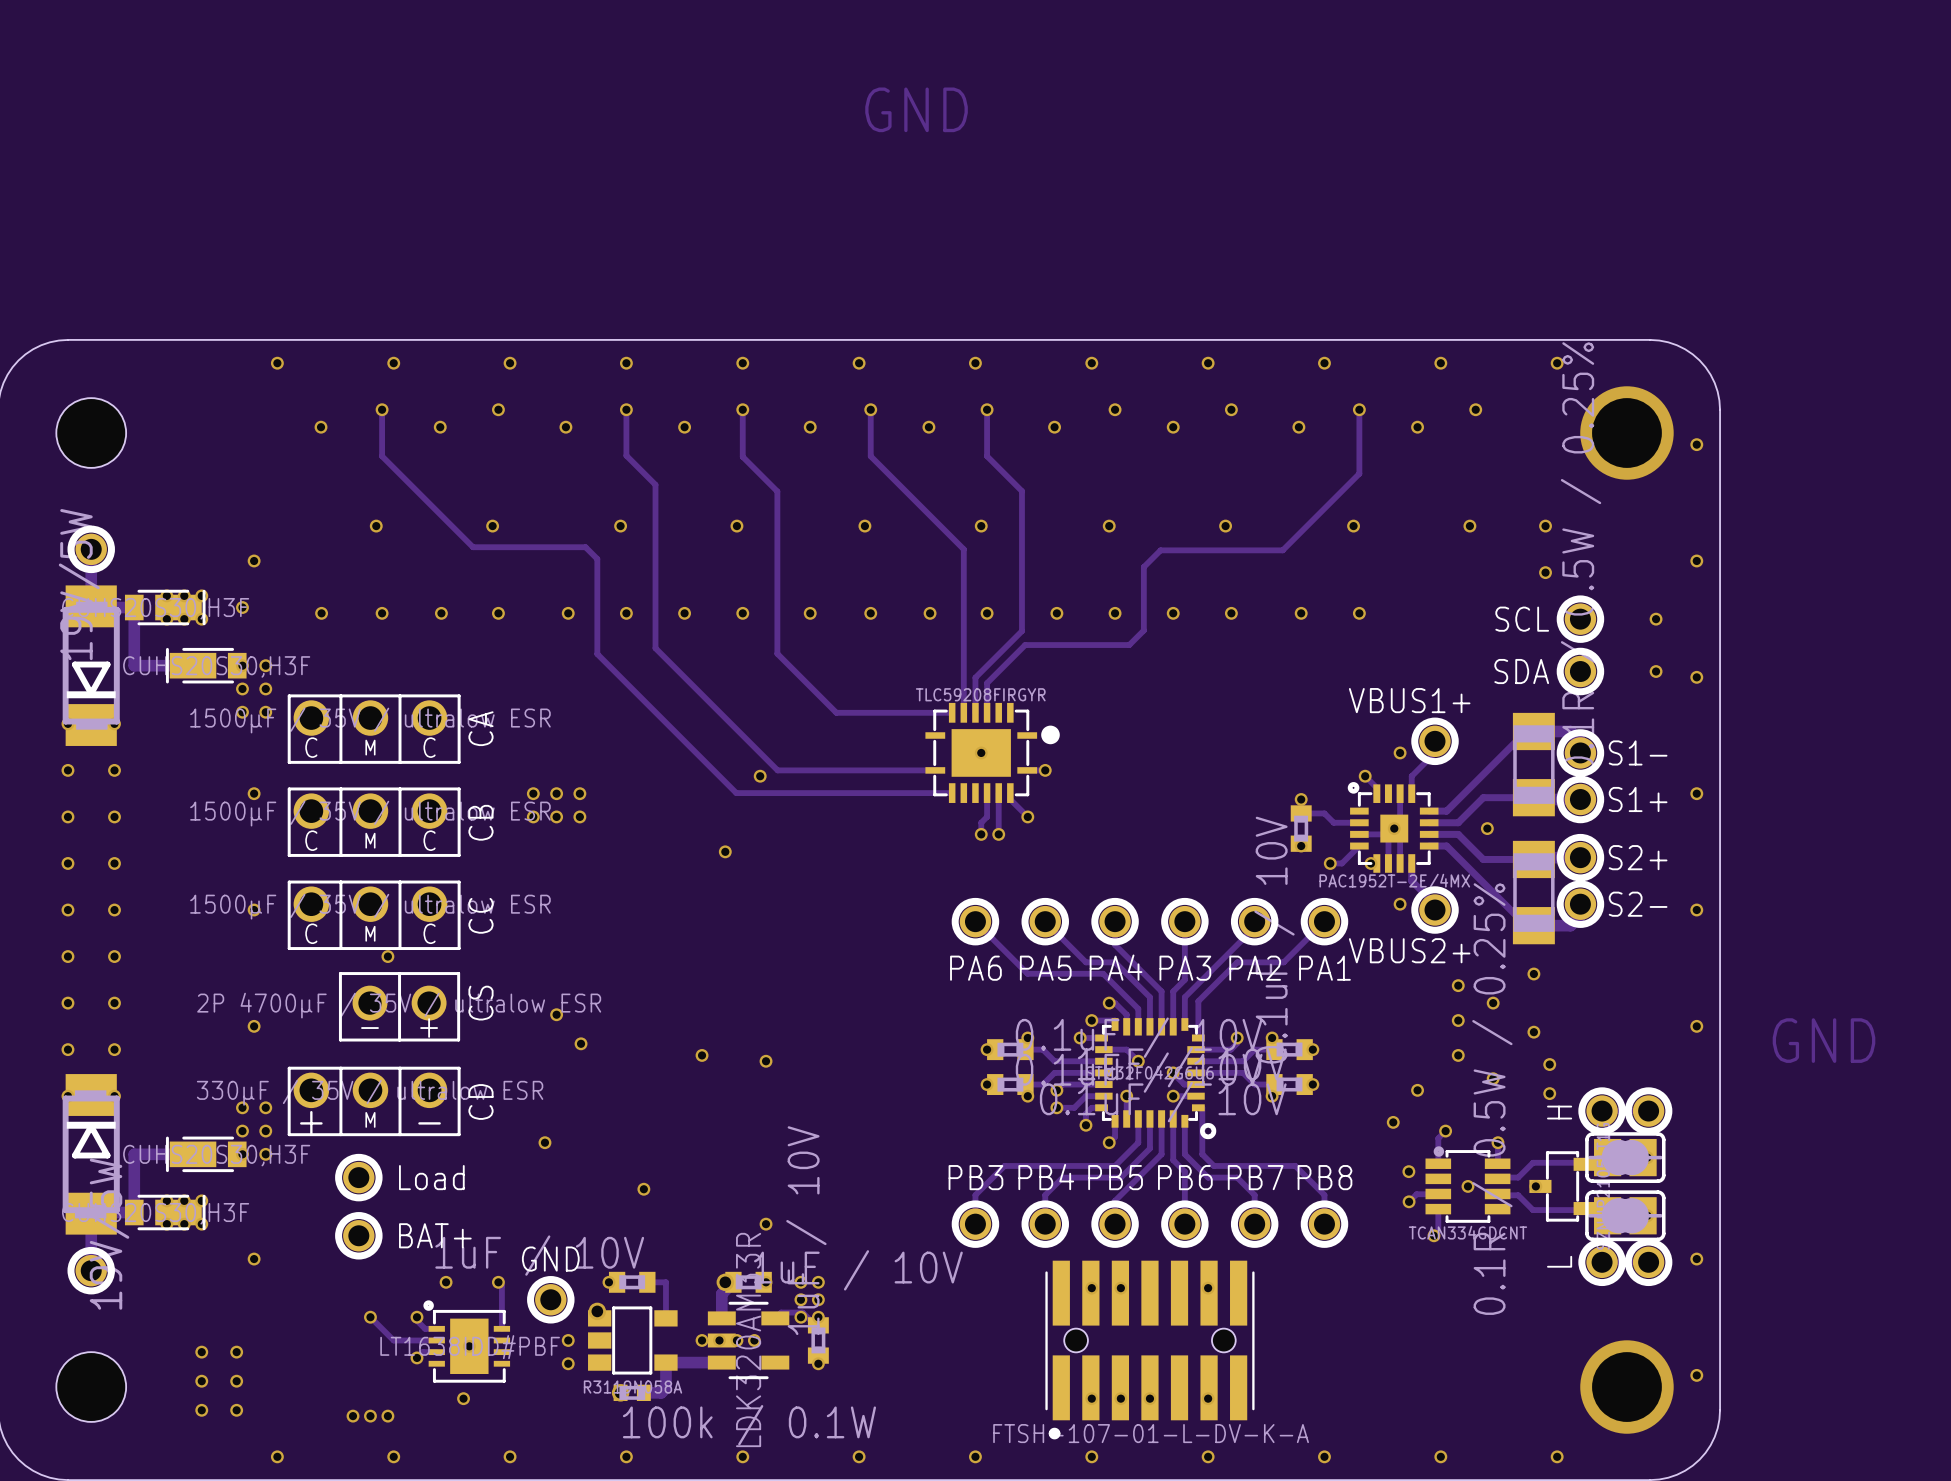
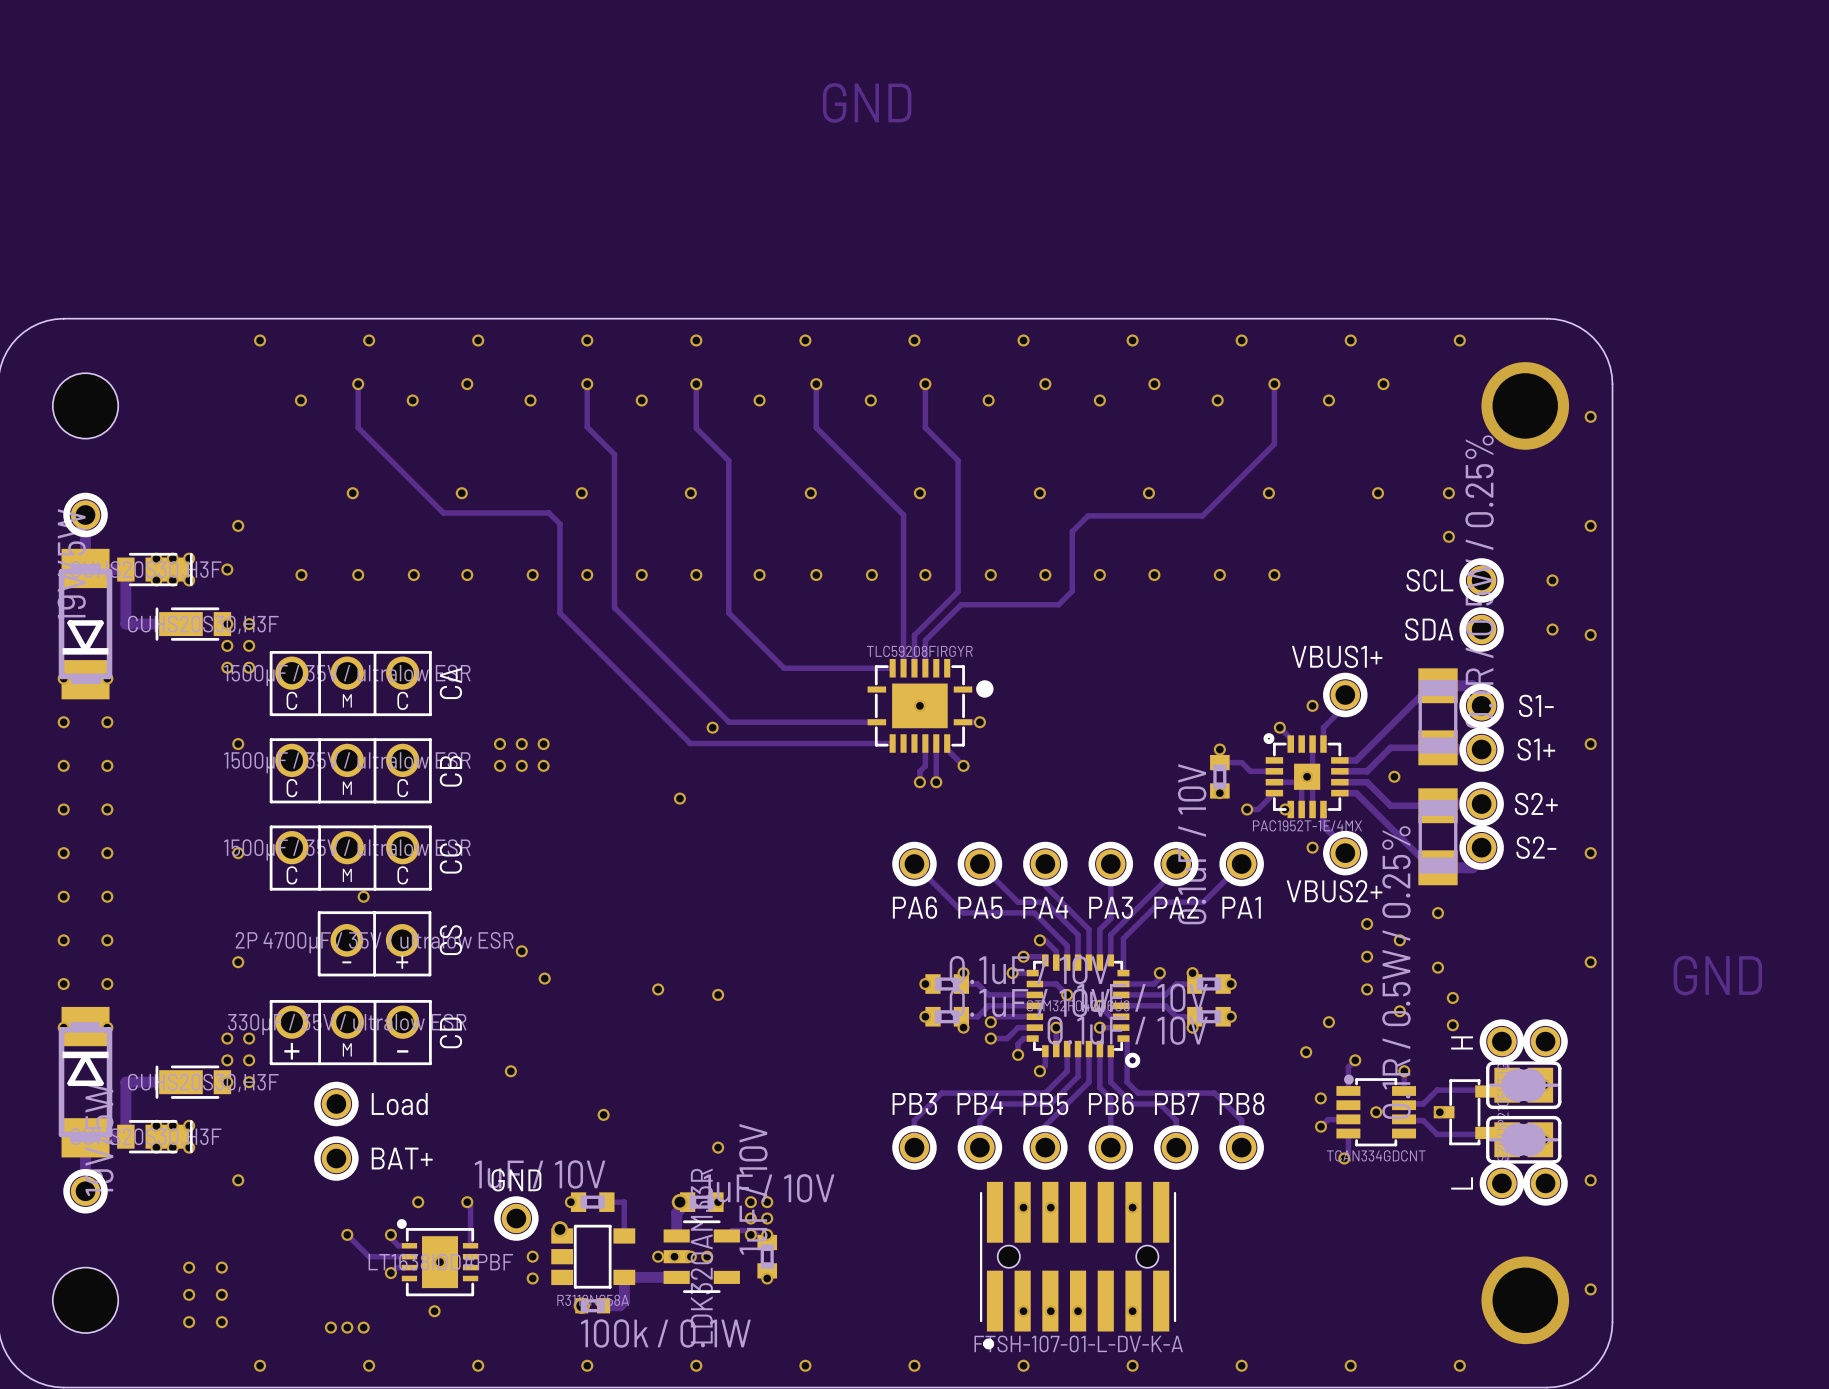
part value: PAC1952T-2E/4MX (1394, 882) -> PAC1952T-1E/4MX (1307, 825)

